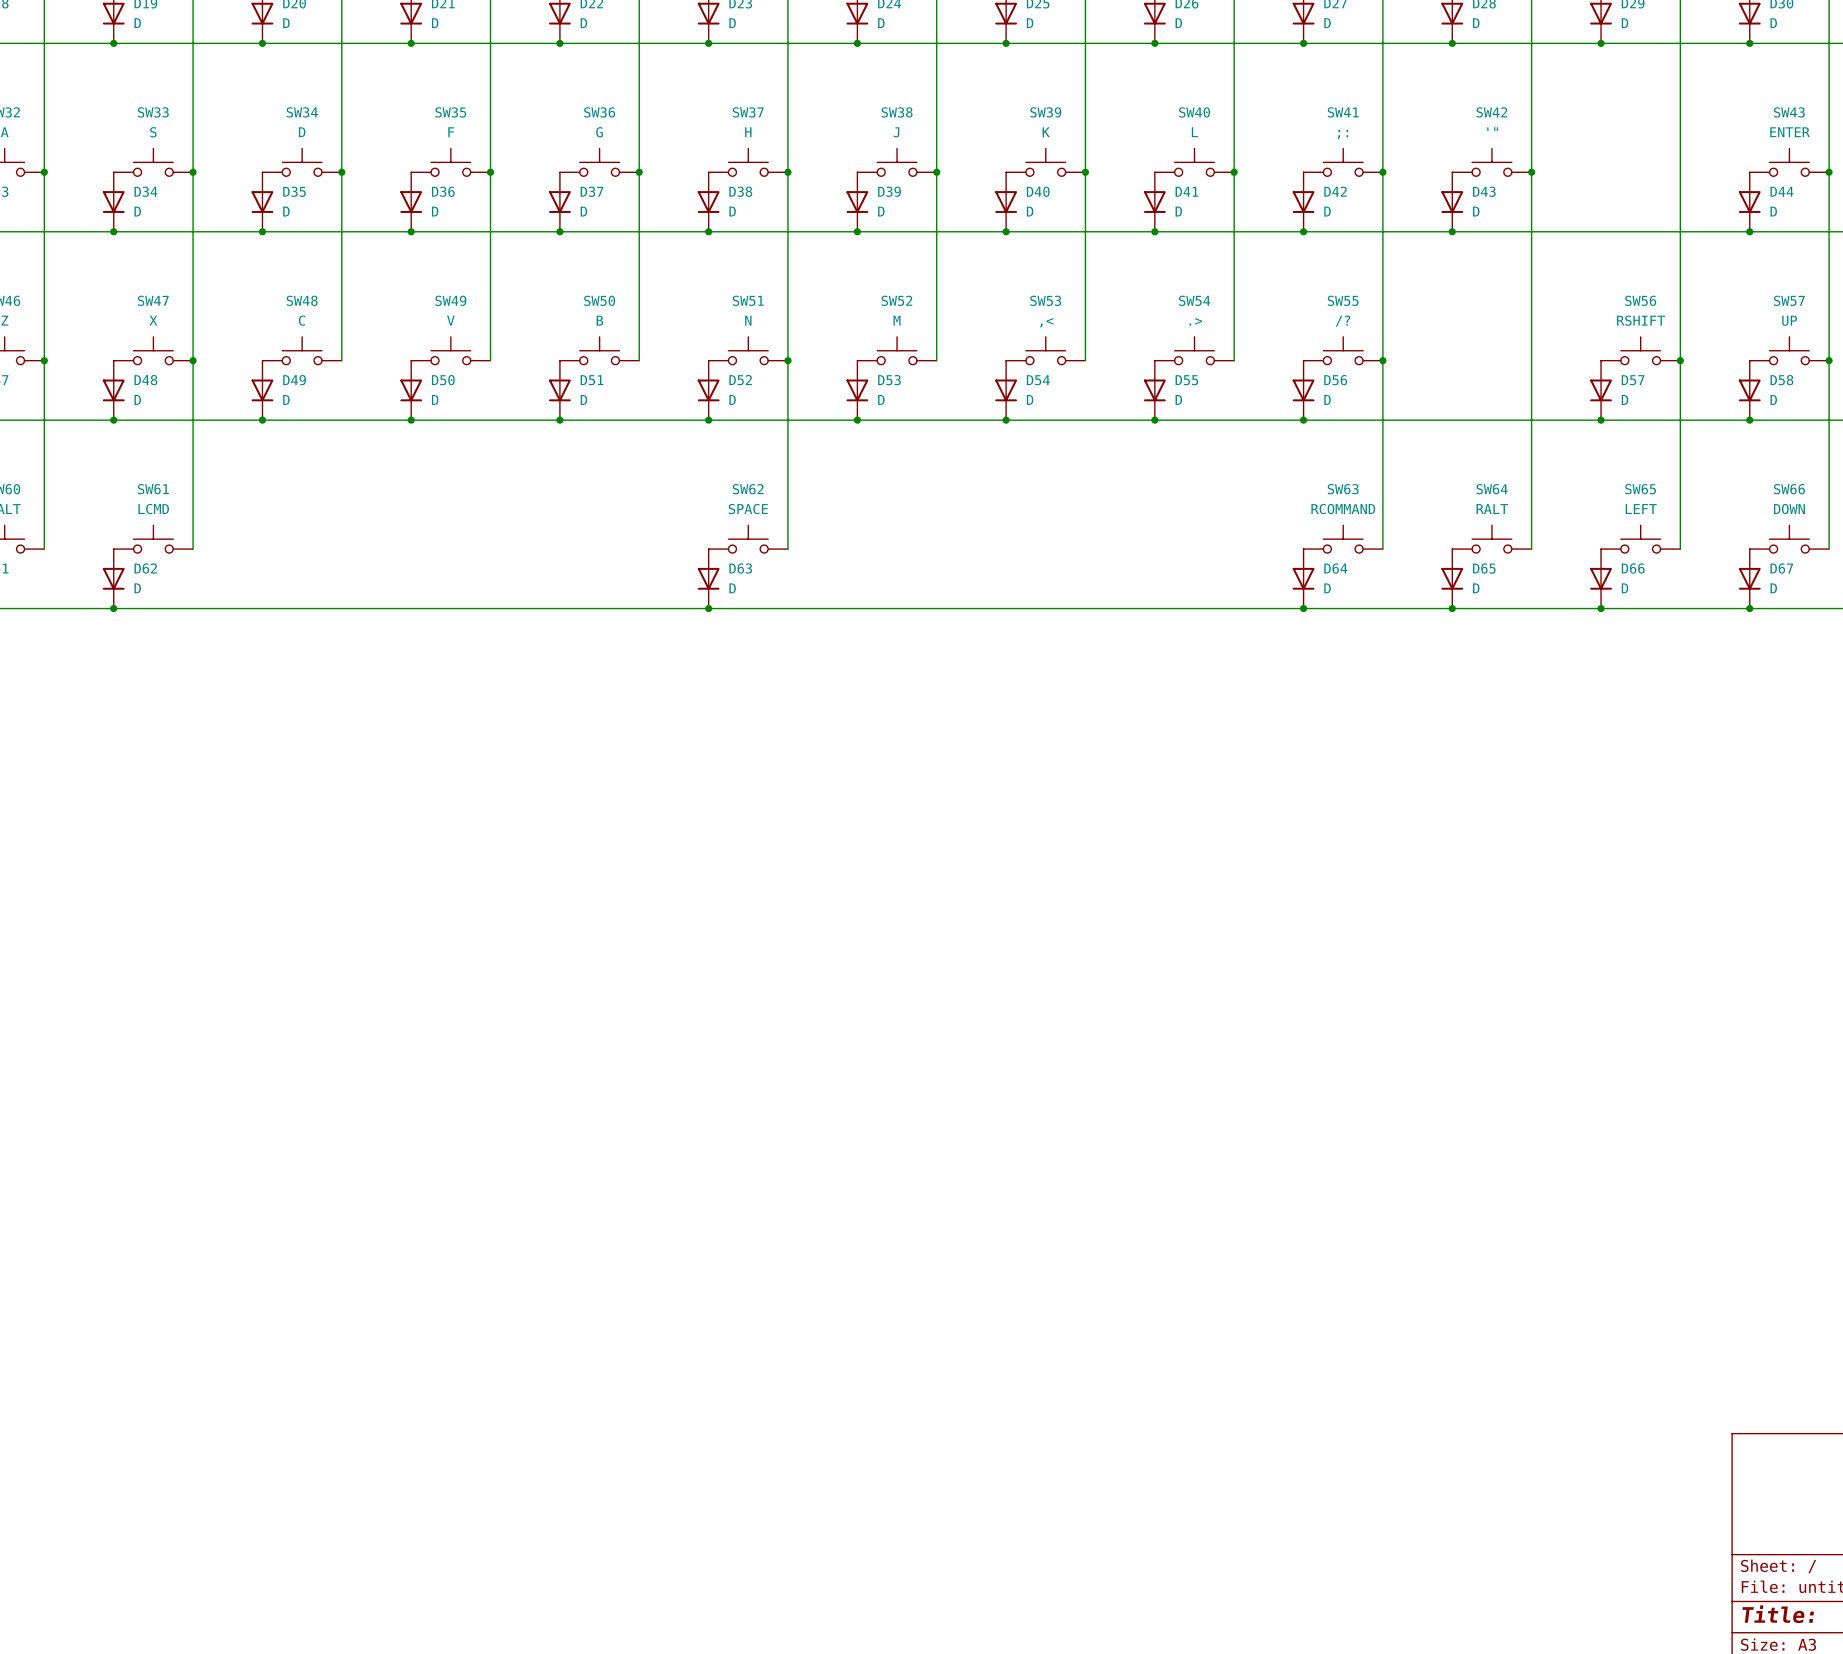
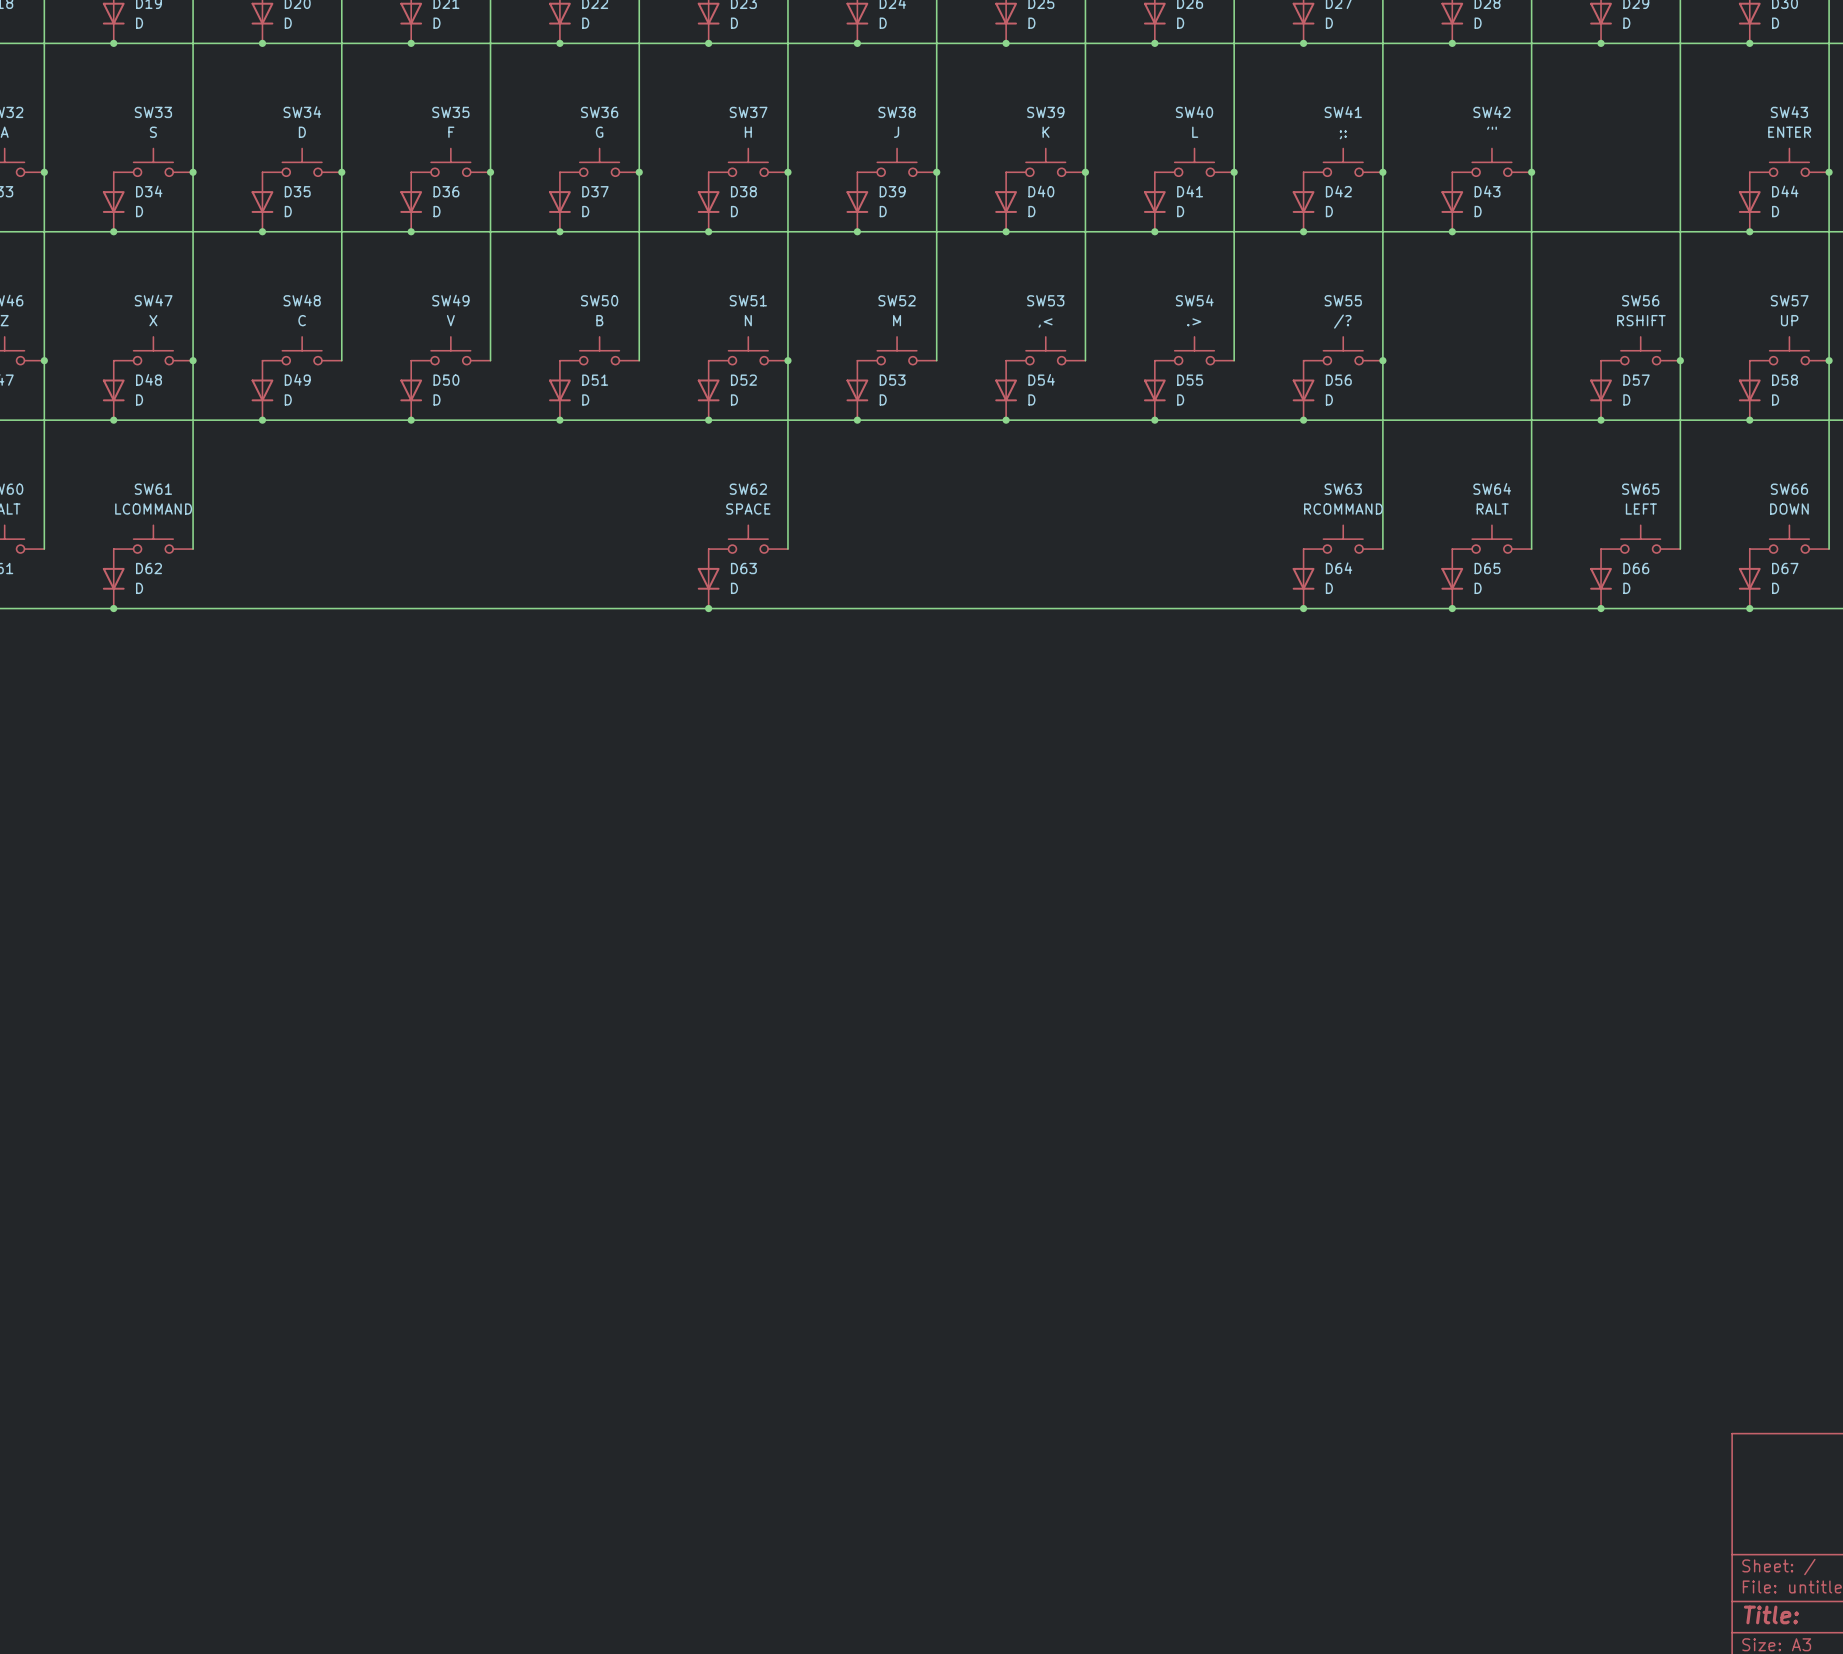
SW61 value: LCMD (153, 509) -> LCOMMAND (153, 509)

